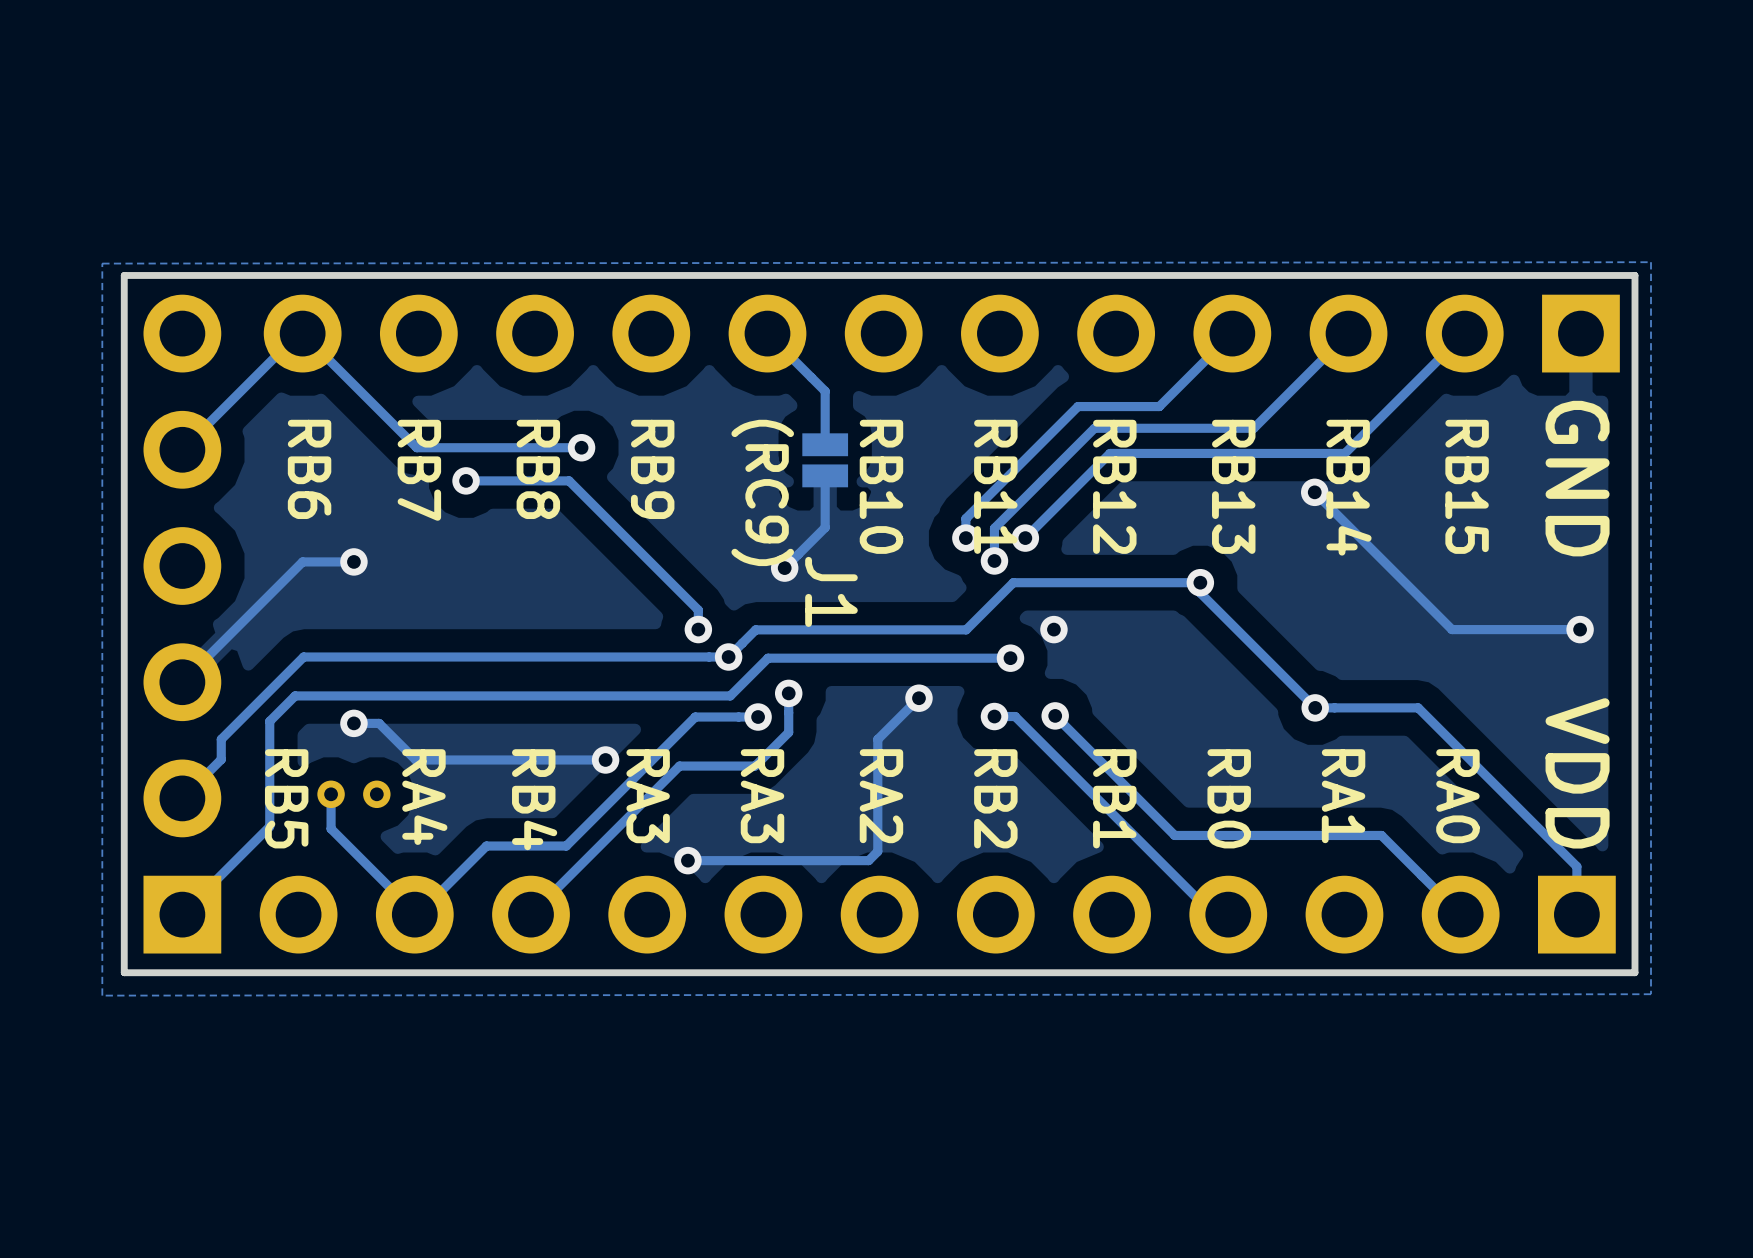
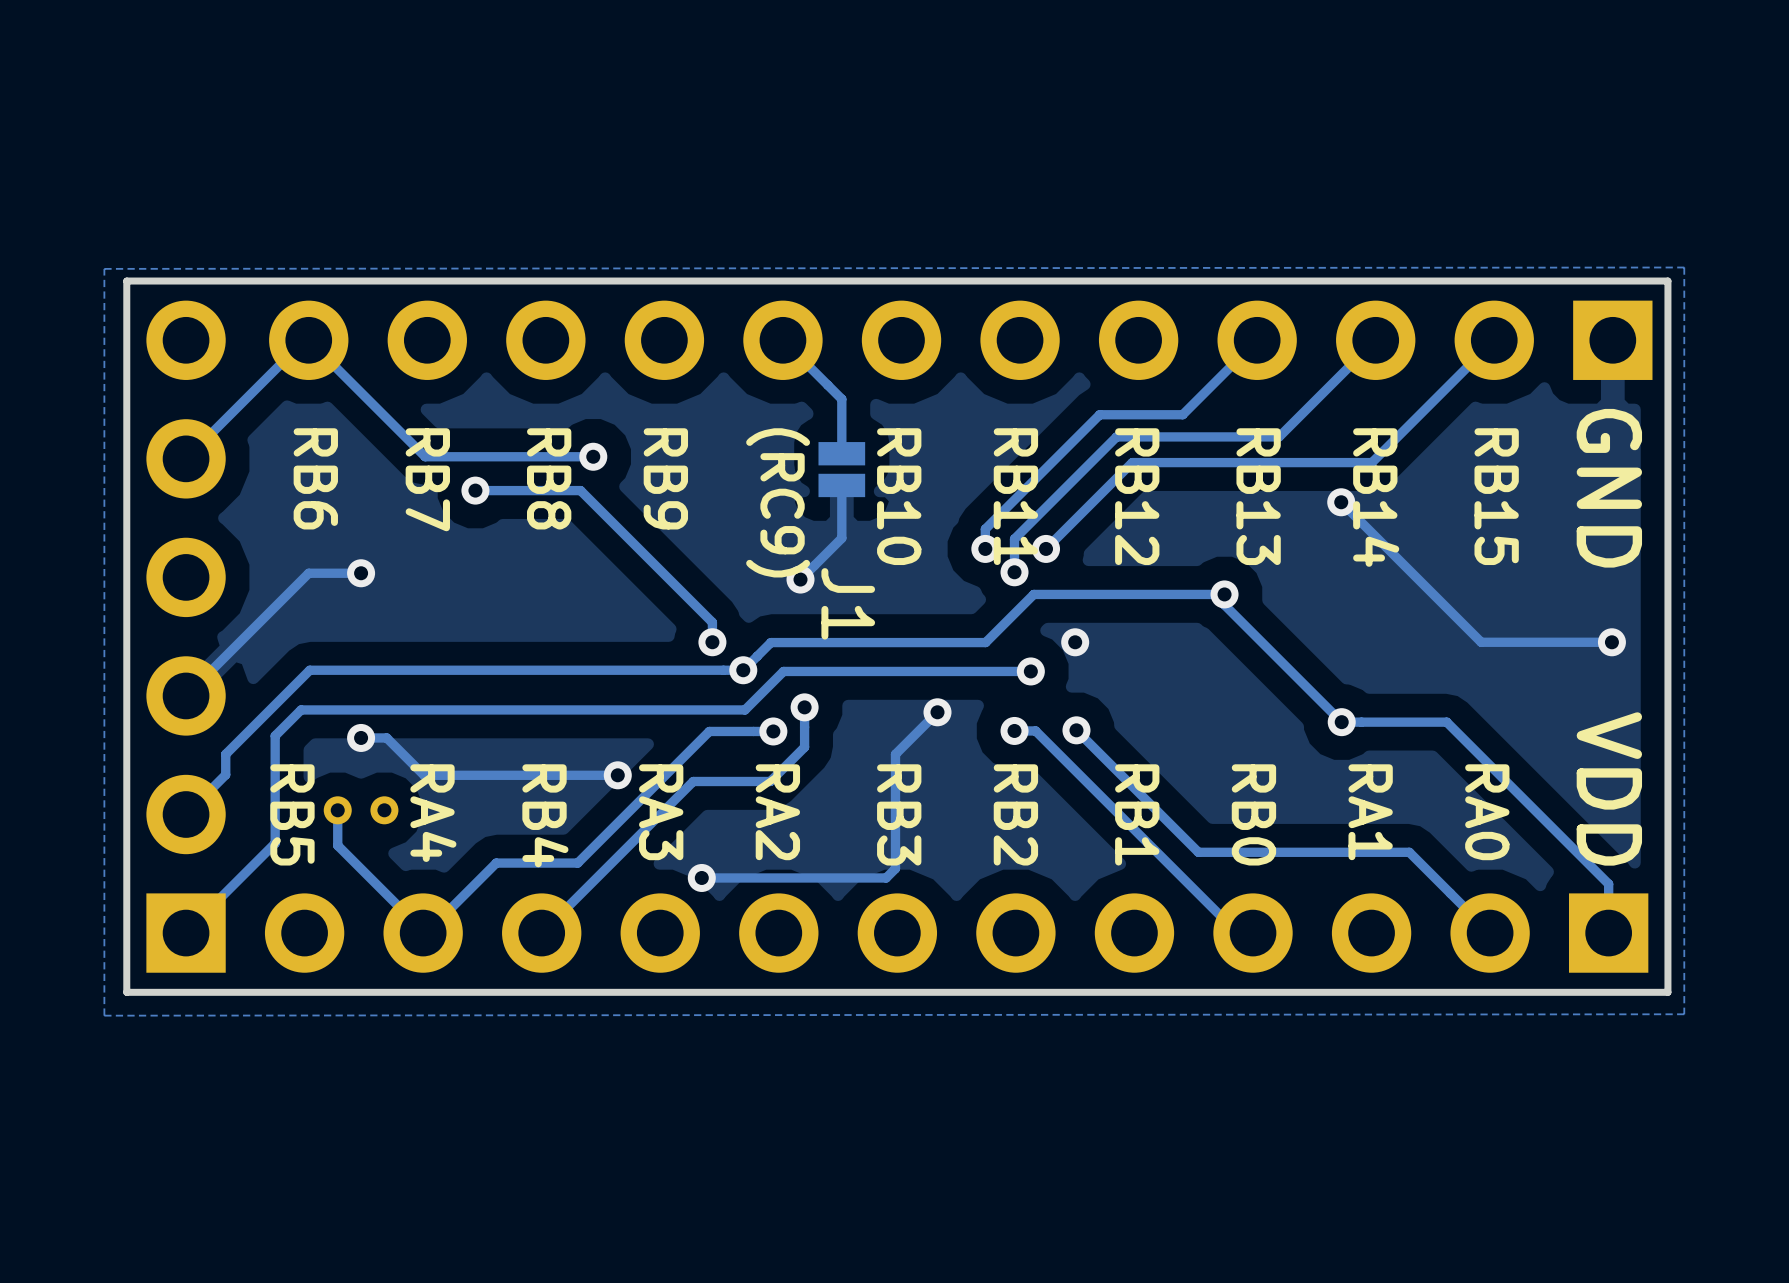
text: RA3 (762, 796) -> RA2 (777, 812)
text: RA2 (881, 796) -> RB3 (899, 814)

